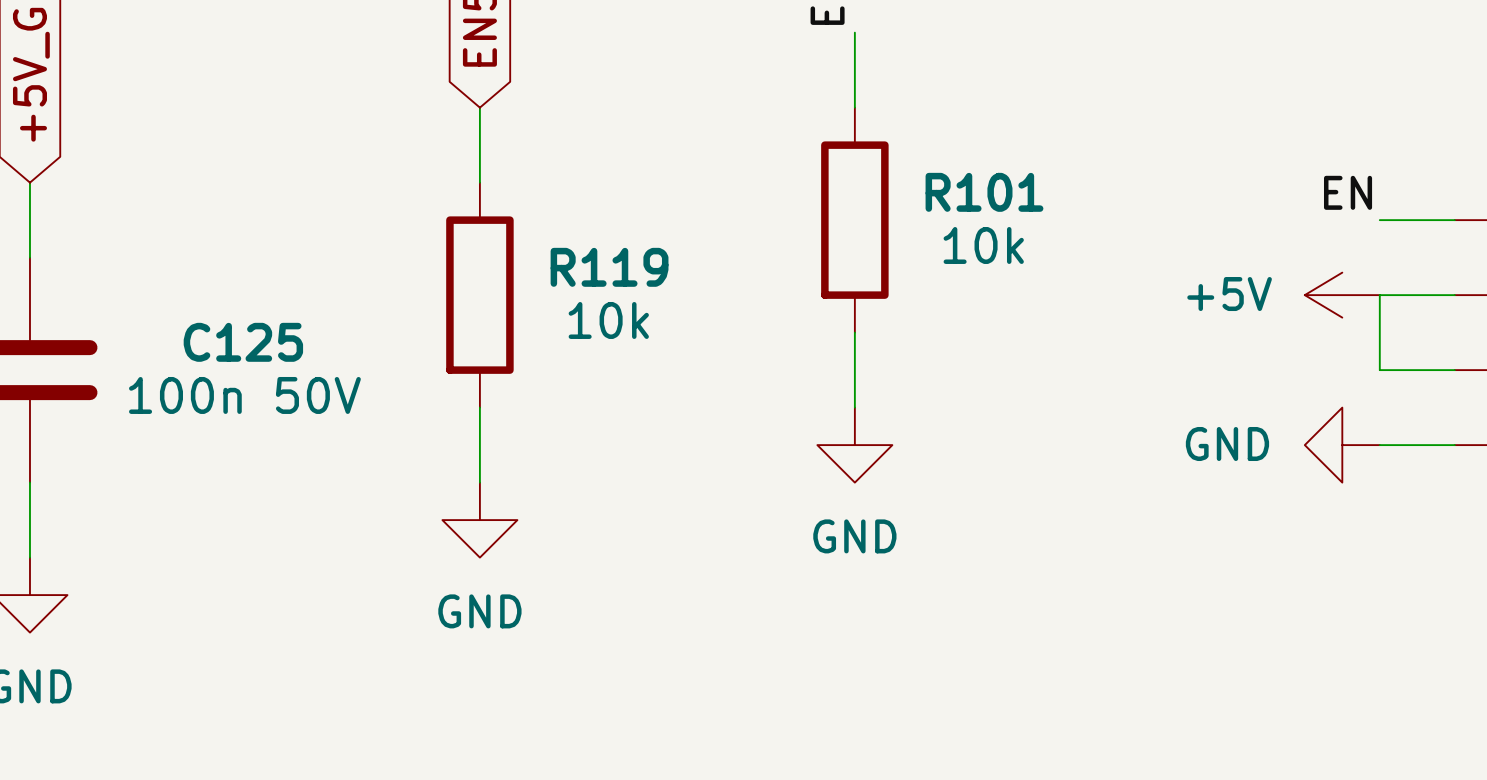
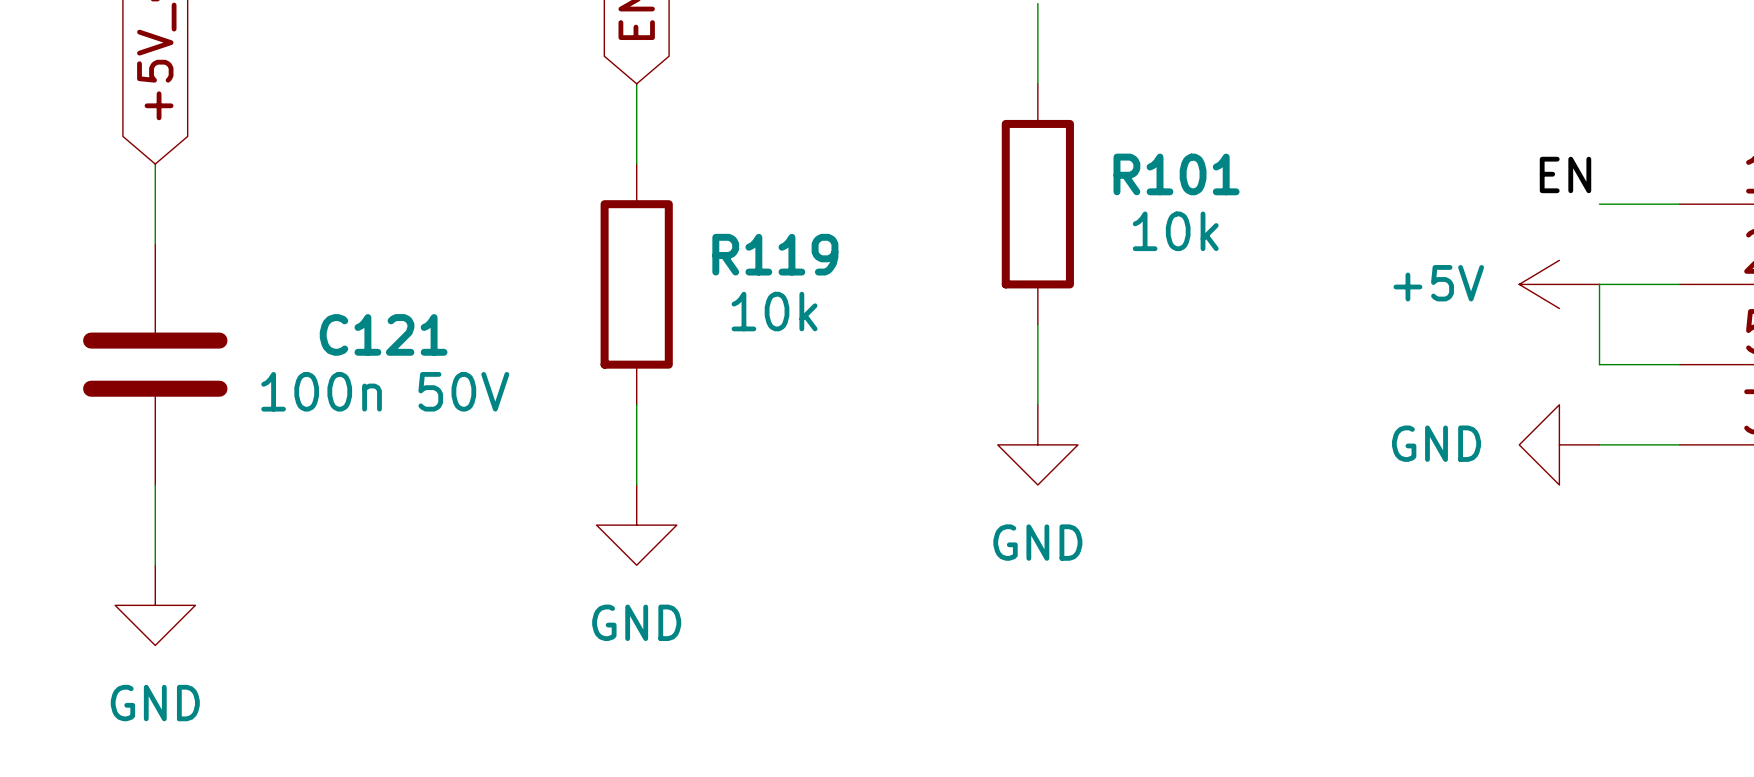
C125 name: C125 (243, 342) -> C121 (383, 334)

